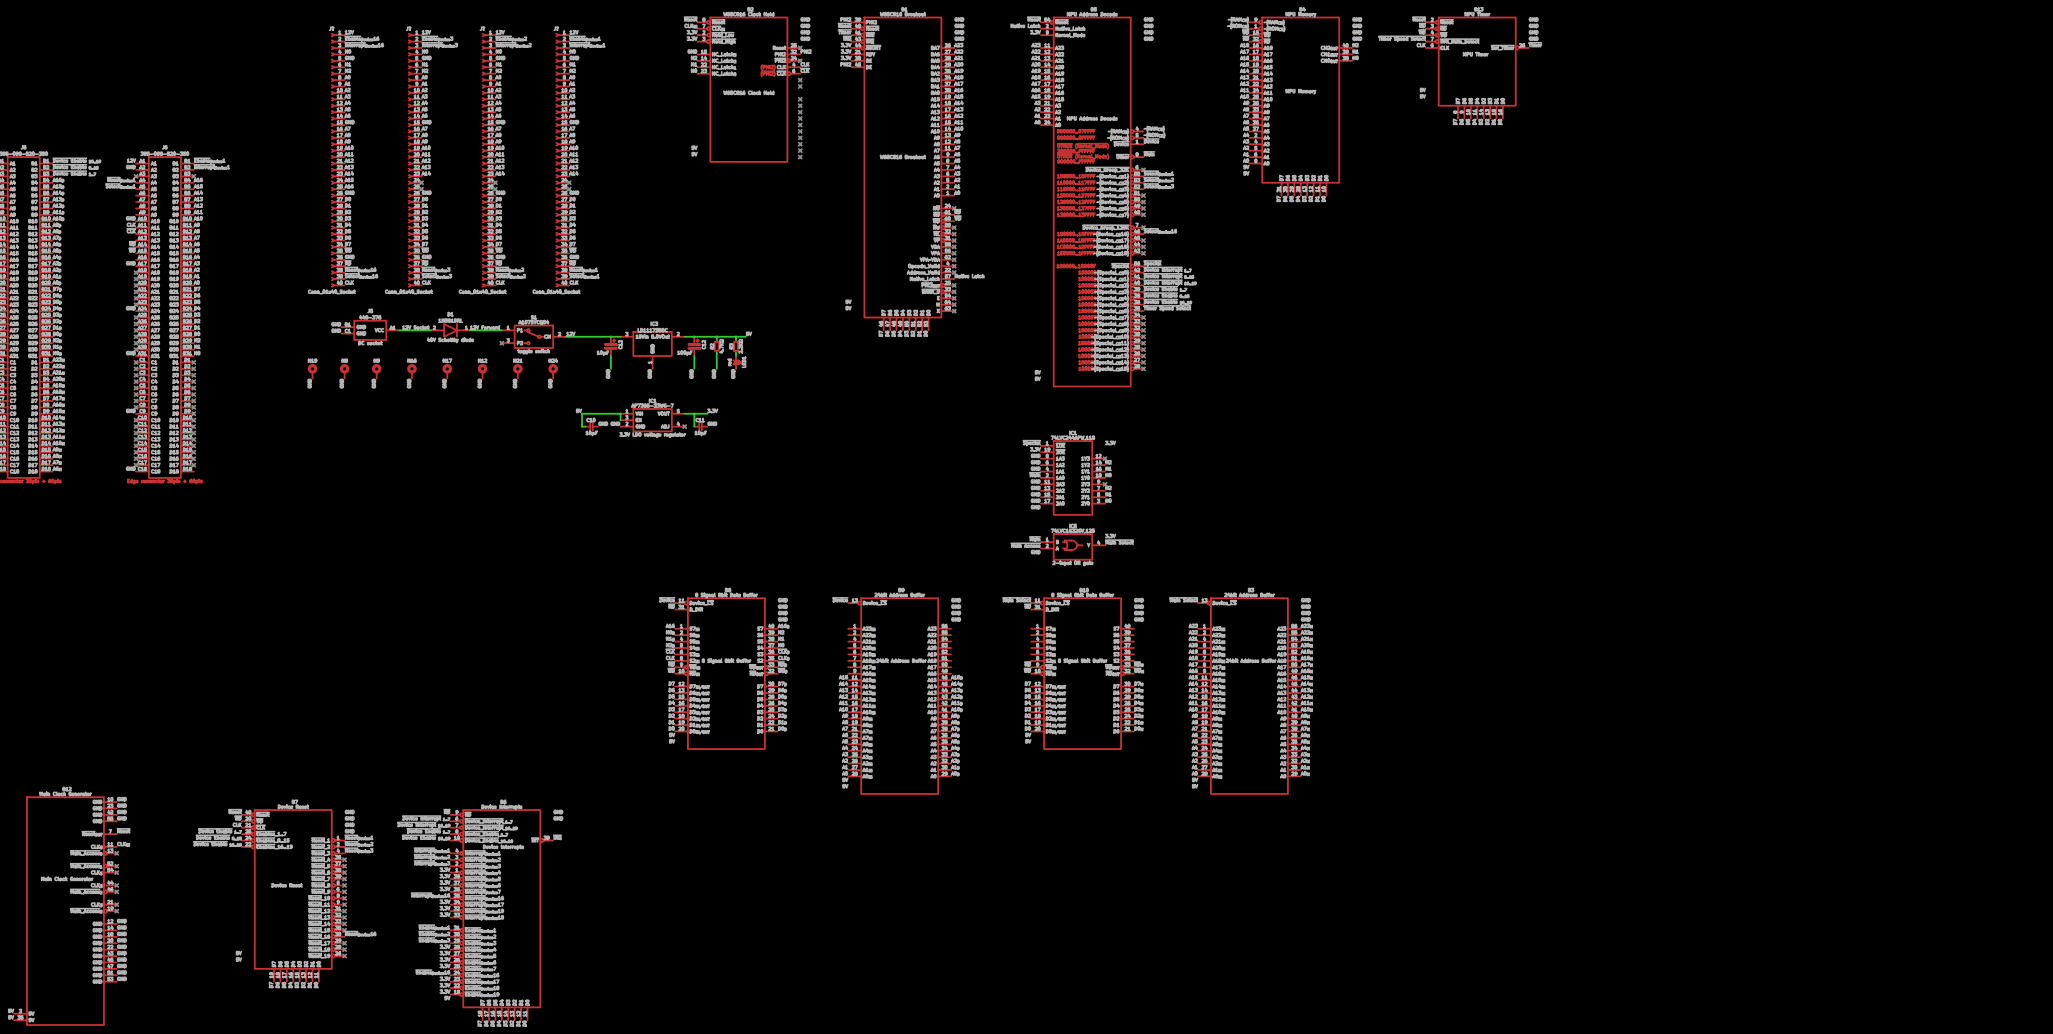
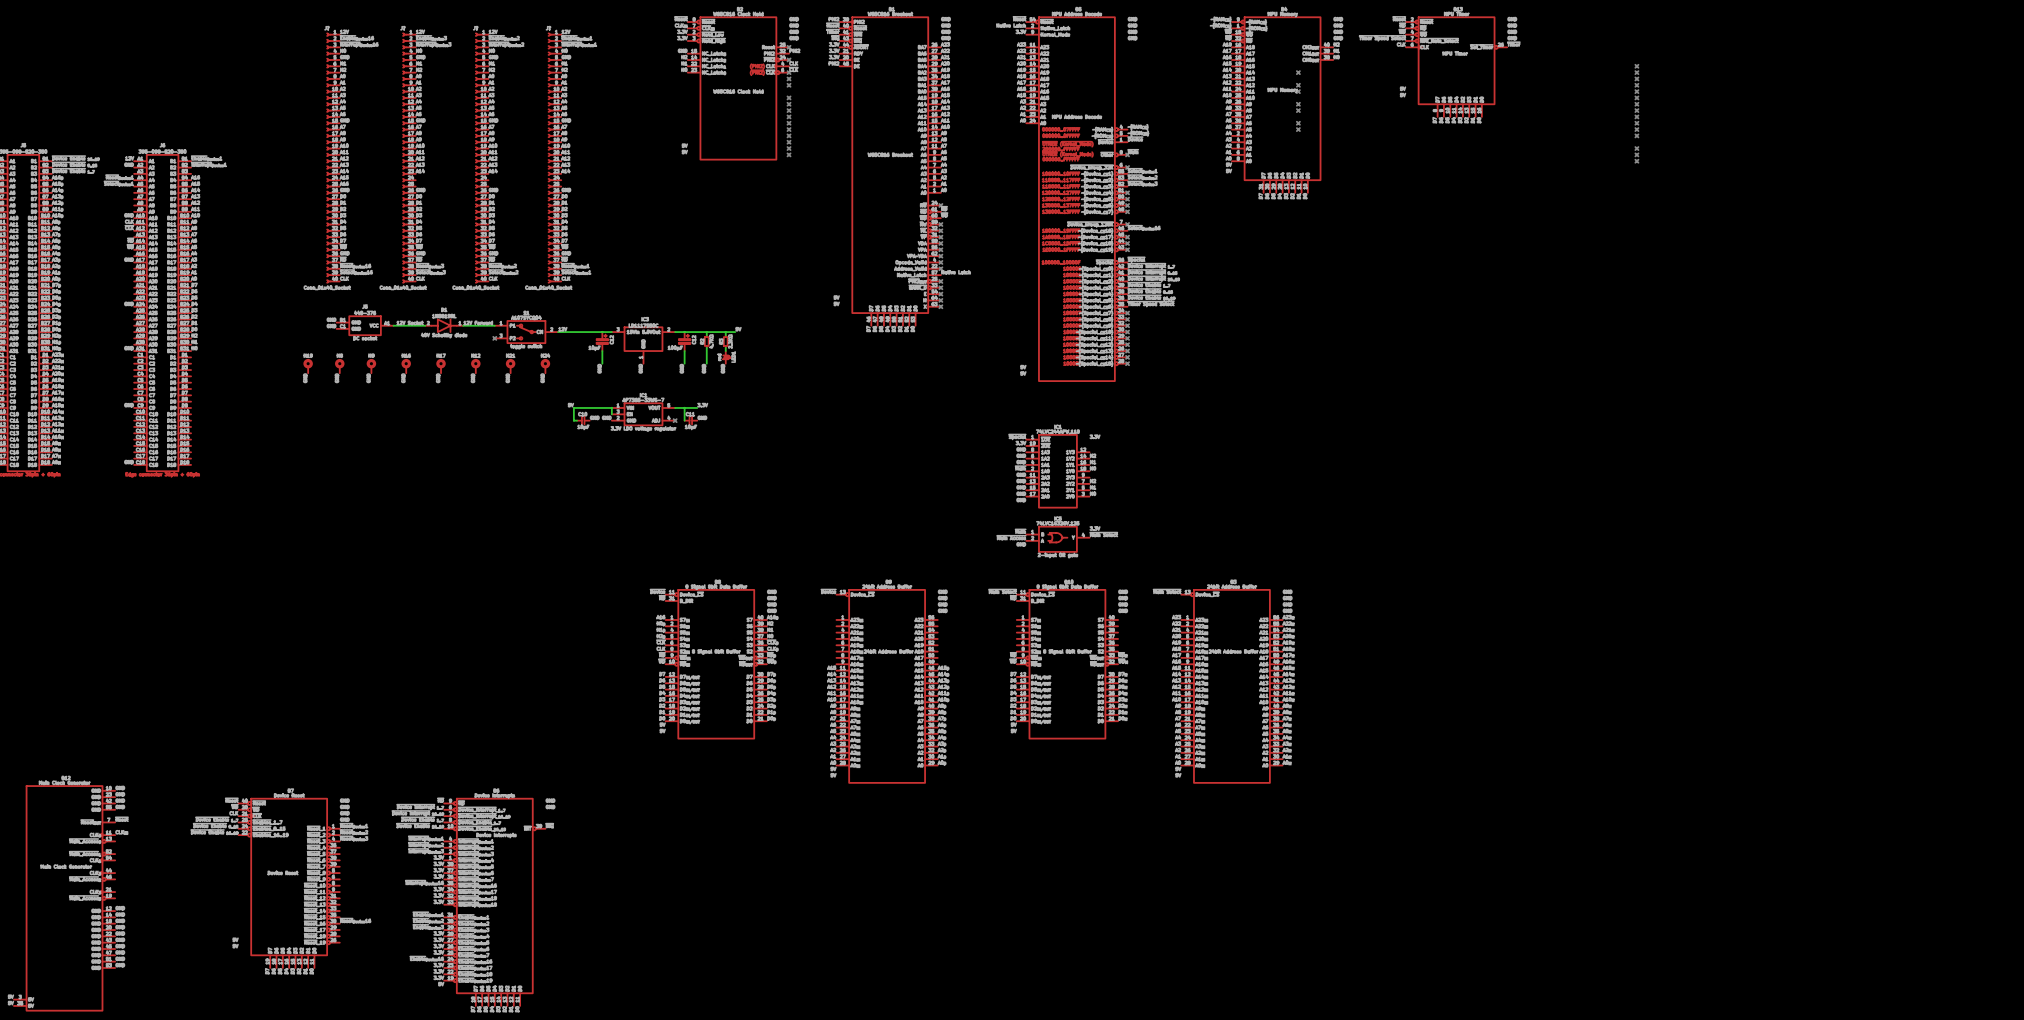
no-connect mark: none -> (1636, 66)
no-connect mark: none -> (789, 72)
no-connect mark: none -> (1298, 72)
no-connect mark: none -> (1636, 72)
no-connect mark: none -> (1636, 78)
no-connect mark: none -> (1298, 85)
no-connect mark: none -> (1636, 85)
no-connect mark: none -> (1298, 91)
no-connect mark: none -> (1636, 91)
no-connect mark: none -> (1636, 97)
no-connect mark: none -> (1298, 104)
no-connect mark: none -> (1636, 104)
no-connect mark: none -> (1298, 110)
no-connect mark: none -> (1636, 110)
no-connect mark: none -> (1636, 116)
no-connect mark: none -> (1298, 123)
no-connect mark: none -> (1636, 123)
no-connect mark: none -> (1298, 129)
no-connect mark: none -> (1636, 129)
no-connect mark: none -> (1636, 135)
no-connect mark: none -> (1636, 148)
no-connect mark: none -> (1127, 154)
no-connect mark: none -> (1636, 154)
no-connect mark: none -> (1636, 161)
no-connect mark: (136, 176) -> none
no-connect mark: (193, 176) -> none
no-connect mark: (421, 182) -> none
no-connect mark: (495, 182) -> none
no-connect mark: (569, 182) -> none
no-connect mark: (421, 189) -> none
no-connect mark: (495, 189) -> none
no-connect mark: (569, 189) -> none
no-connect mark: (136, 272) -> none
no-connect mark: (136, 279) -> none
no-connect mark: (136, 285) -> none
no-connect mark: (136, 291) -> none
no-connect mark: (136, 298) -> none
no-connect mark: (136, 304) -> none
no-connect mark: (136, 317) -> none
no-connect mark: (136, 323) -> none
no-connect mark: (136, 330) -> none
no-connect mark: (136, 336) -> none
no-connect mark: (136, 343) -> none
no-connect mark: (136, 349) -> none
no-connect mark: (136, 362) -> none
no-connect mark: (193, 362) -> none
no-connect mark: (136, 368) -> none
no-connect mark: (193, 368) -> none
no-connect mark: (136, 375) -> none
no-connect mark: (193, 375) -> none
no-connect mark: (136, 381) -> none
no-connect mark: (193, 381) -> none
no-connect mark: (136, 388) -> none
no-connect mark: (193, 388) -> none
no-connect mark: (136, 394) -> none
no-connect mark: (193, 394) -> none
no-connect mark: (136, 400) -> none
no-connect mark: (193, 400) -> none
no-connect mark: (136, 407) -> none
no-connect mark: (193, 407) -> none
no-connect mark: (193, 413) -> none
no-connect mark: (136, 420) -> none
no-connect mark: (193, 420) -> none
no-connect mark: (136, 426) -> none
no-connect mark: (193, 426) -> none
no-connect mark: (136, 433) -> none
no-connect mark: (193, 433) -> none
no-connect mark: (136, 439) -> none
no-connect mark: (193, 439) -> none
no-connect mark: (136, 445) -> none
no-connect mark: (193, 445) -> none
no-connect mark: (136, 452) -> none
no-connect mark: (193, 452) -> none
no-connect mark: (136, 458) -> none
no-connect mark: (193, 458) -> none
no-connect mark: (1105, 458) -> none
no-connect mark: (136, 465) -> none
no-connect mark: (193, 465) -> none
no-connect mark: (1105, 484) -> none
no-connect mark: (116, 853) -> none
no-connect mark: (344, 859) -> none
no-connect mark: (116, 866) -> none
no-connect mark: (344, 866) -> none
no-connect mark: (116, 872) -> none
no-connect mark: (344, 872) -> none
no-connect mark: (344, 879) -> none
no-connect mark: (116, 885) -> none
no-connect mark: (344, 885) -> none
no-connect mark: (116, 891) -> none
no-connect mark: (344, 891) -> none
no-connect mark: (344, 898) -> none
no-connect mark: (116, 904) -> none
no-connect mark: (344, 904) -> none
no-connect mark: (116, 911) -> none
no-connect mark: (344, 911) -> none
no-connect mark: (344, 917) -> none
no-connect mark: (344, 923) -> none
no-connect mark: (344, 930) -> none
no-connect mark: (344, 943) -> none
no-connect mark: (344, 949) -> none
no-connect mark: (344, 956) -> none

